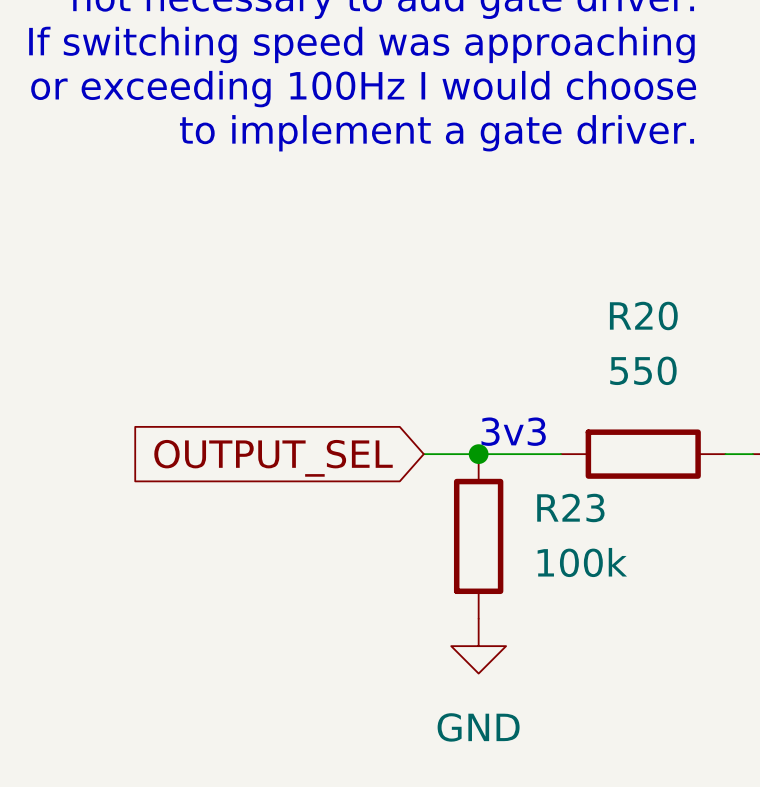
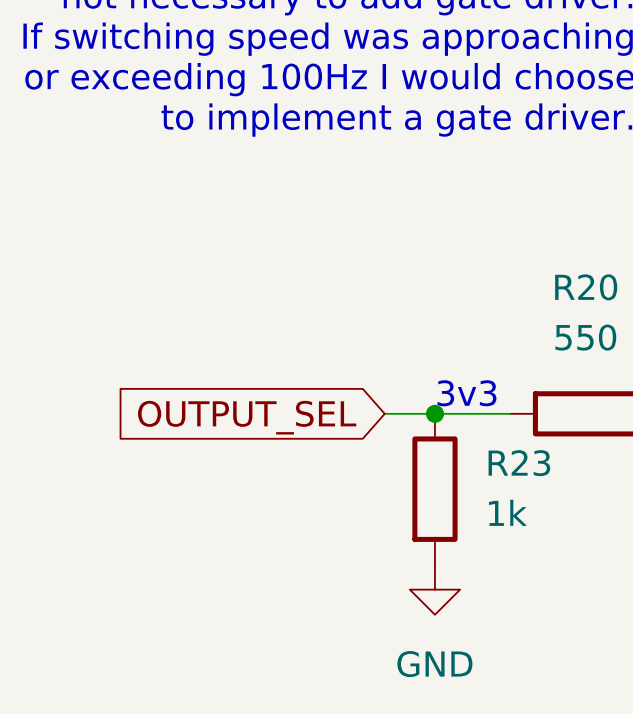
R23 value: 100k (582, 562) -> 1k (507, 512)

